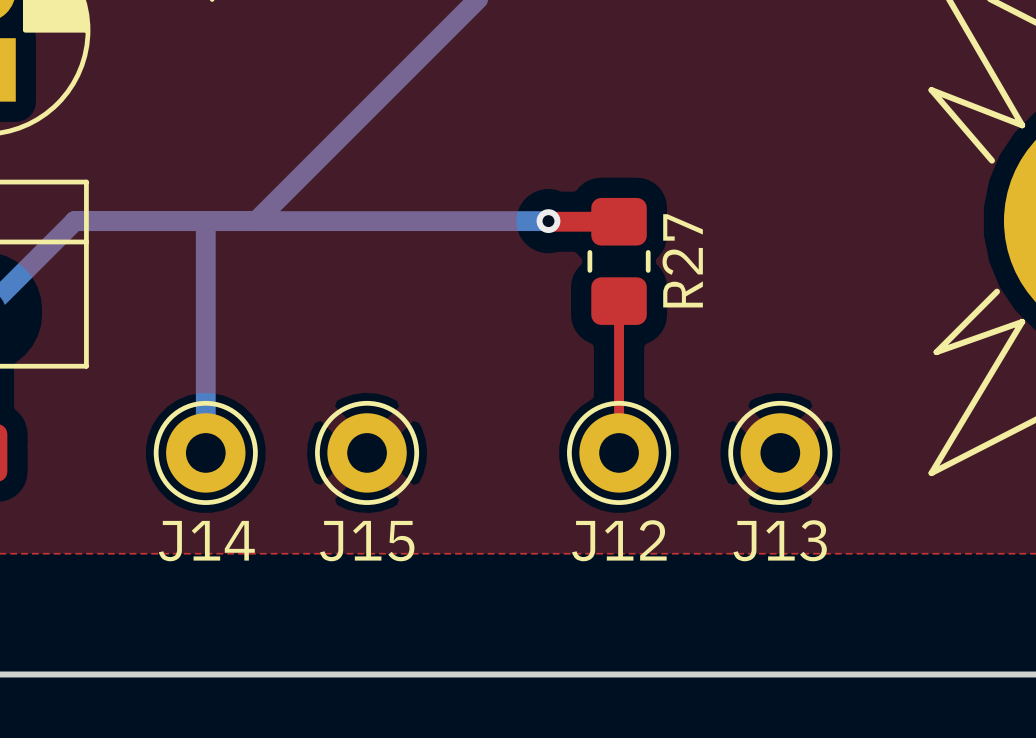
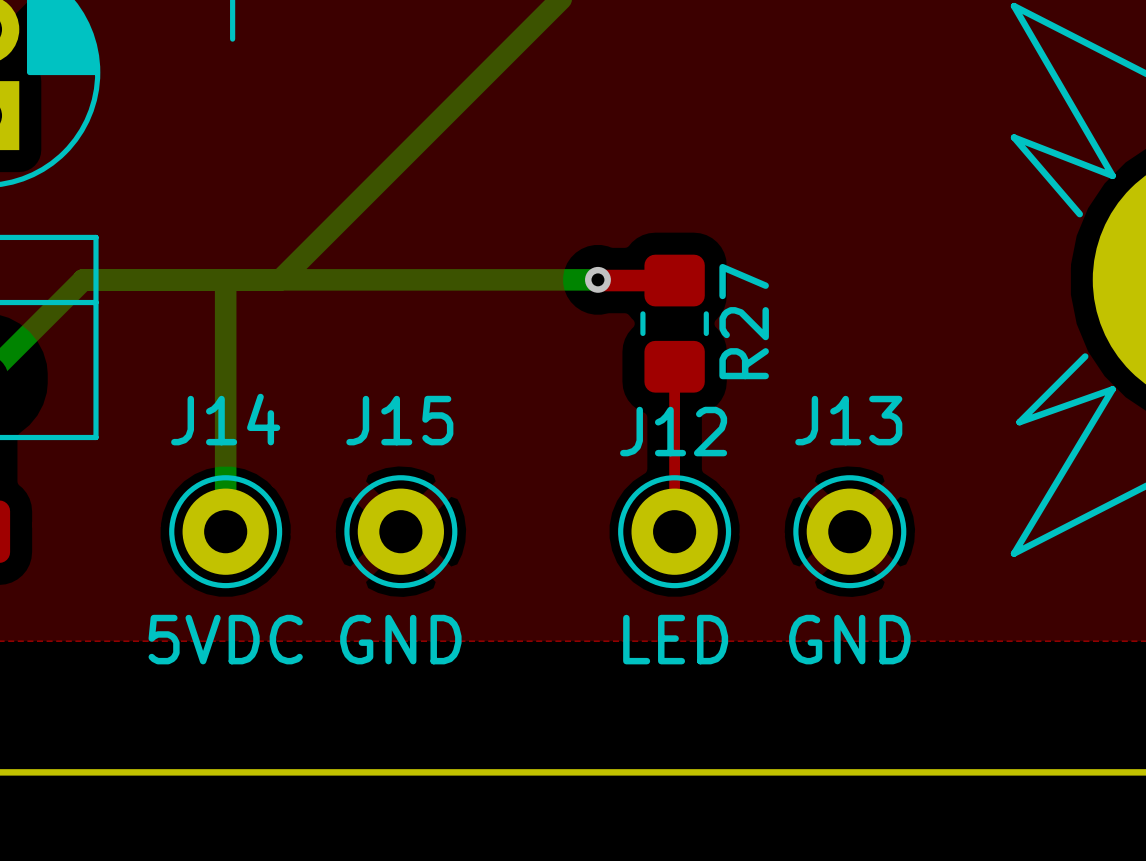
J12 name position: J12 (619, 540) -> J12 (673, 431)
J13 name position: J13 (780, 540) -> J13 (848, 420)
J14 name position: J14 (206, 541) -> J14 (225, 419)
J15 name position: J15 (367, 541) -> J15 (399, 420)
text: none -> 5VDC (225, 639)
text: none -> GND (400, 639)
text: none -> LED (675, 639)
text: none -> GND (849, 639)

